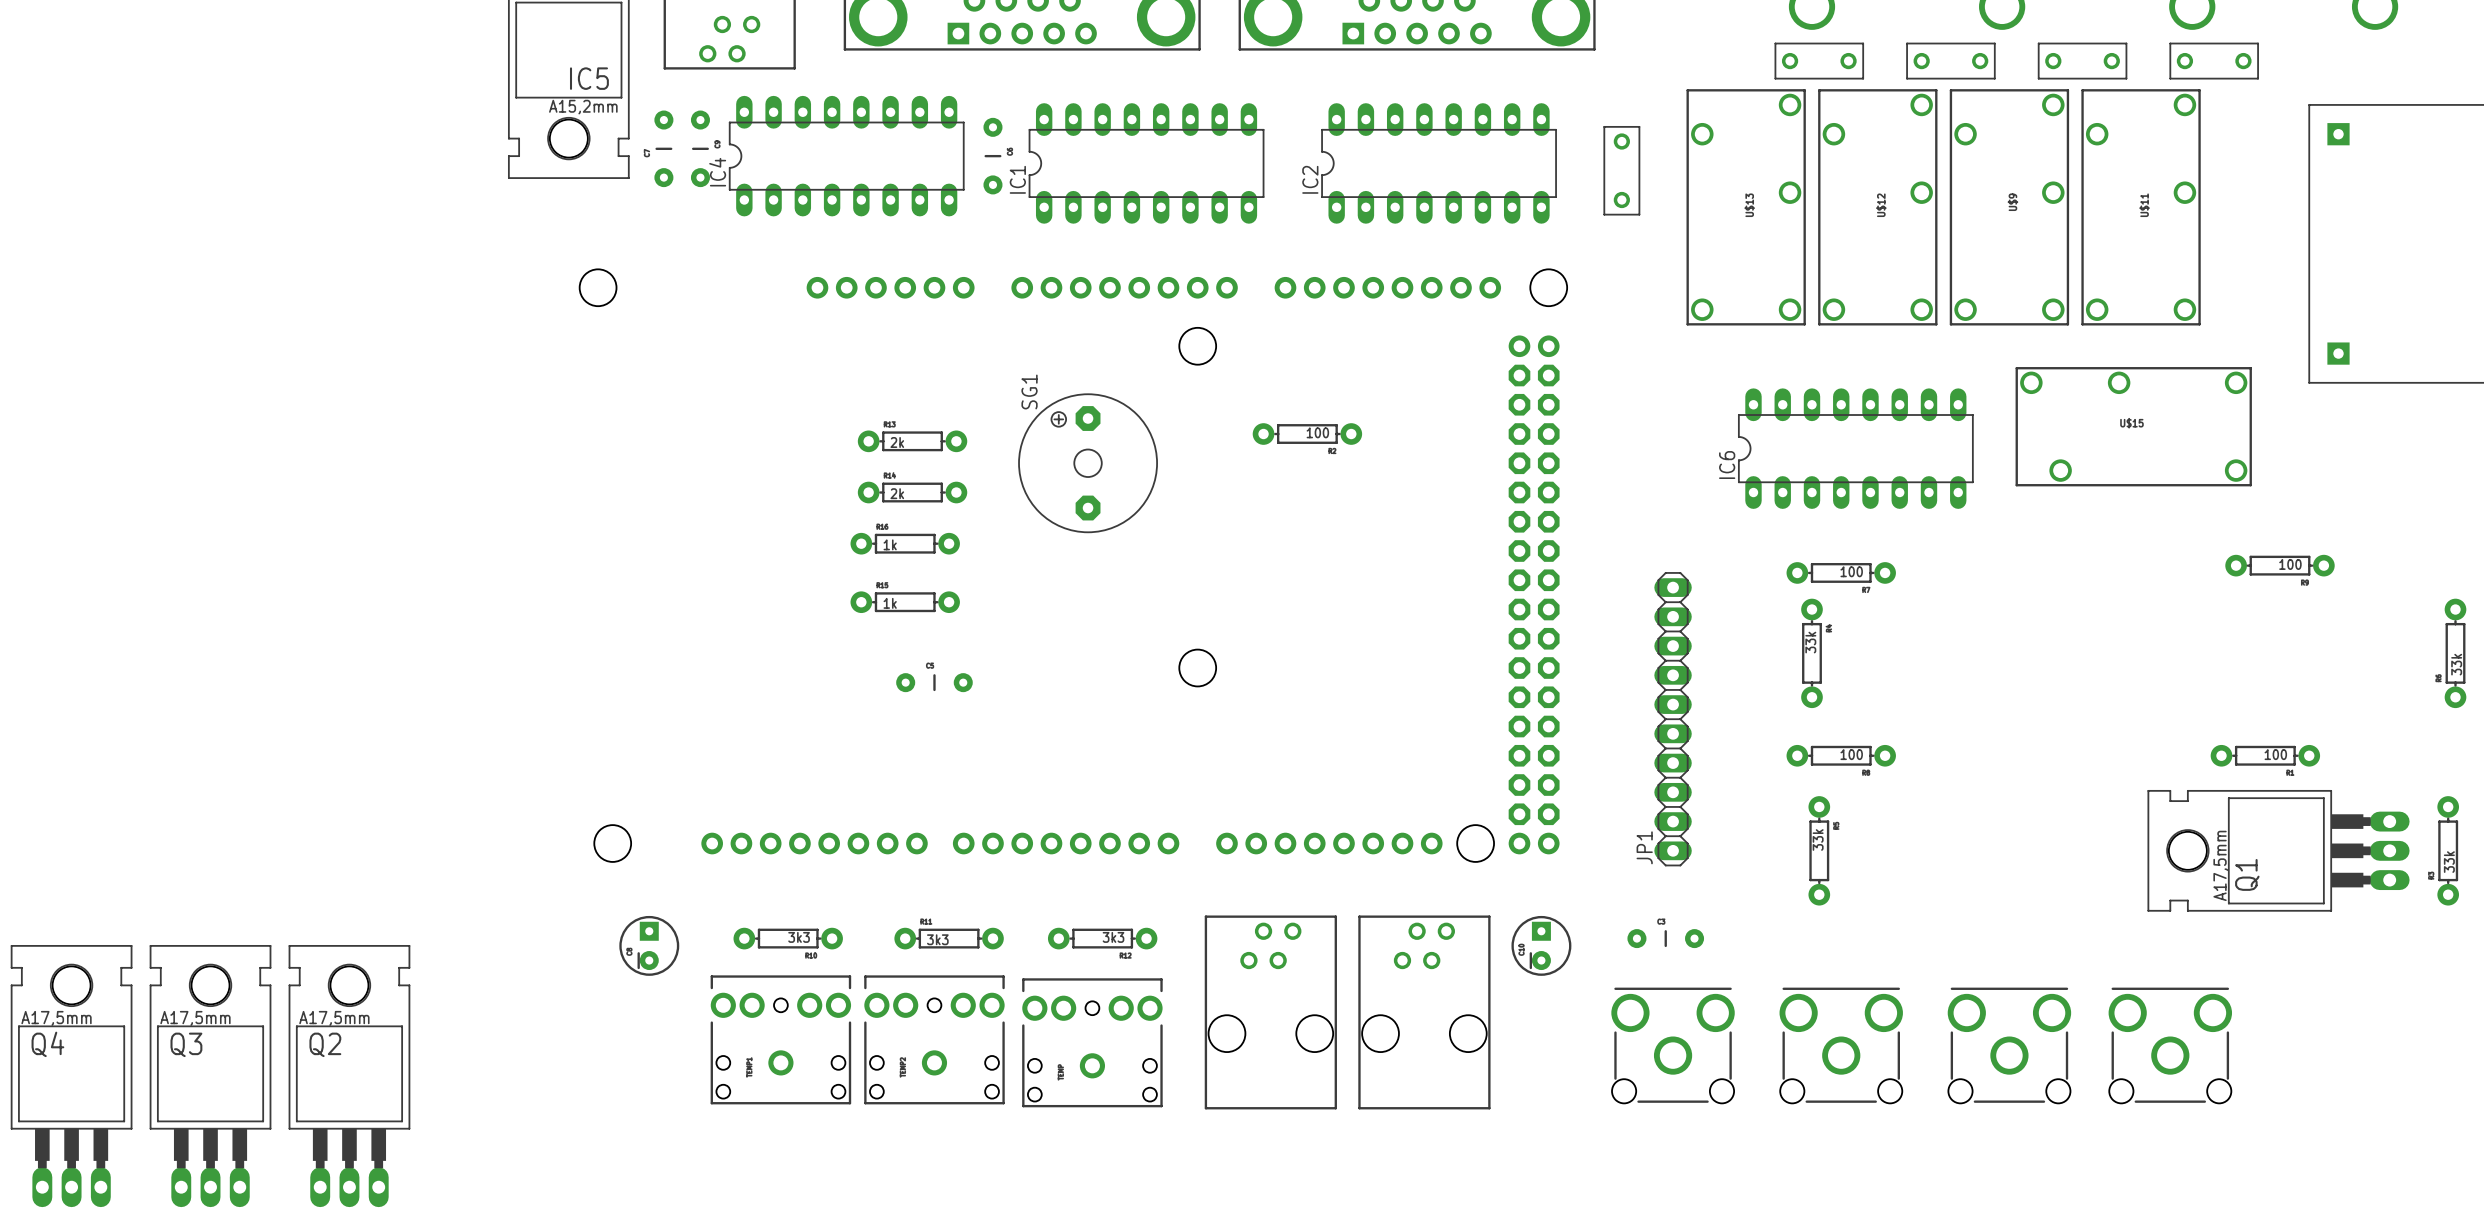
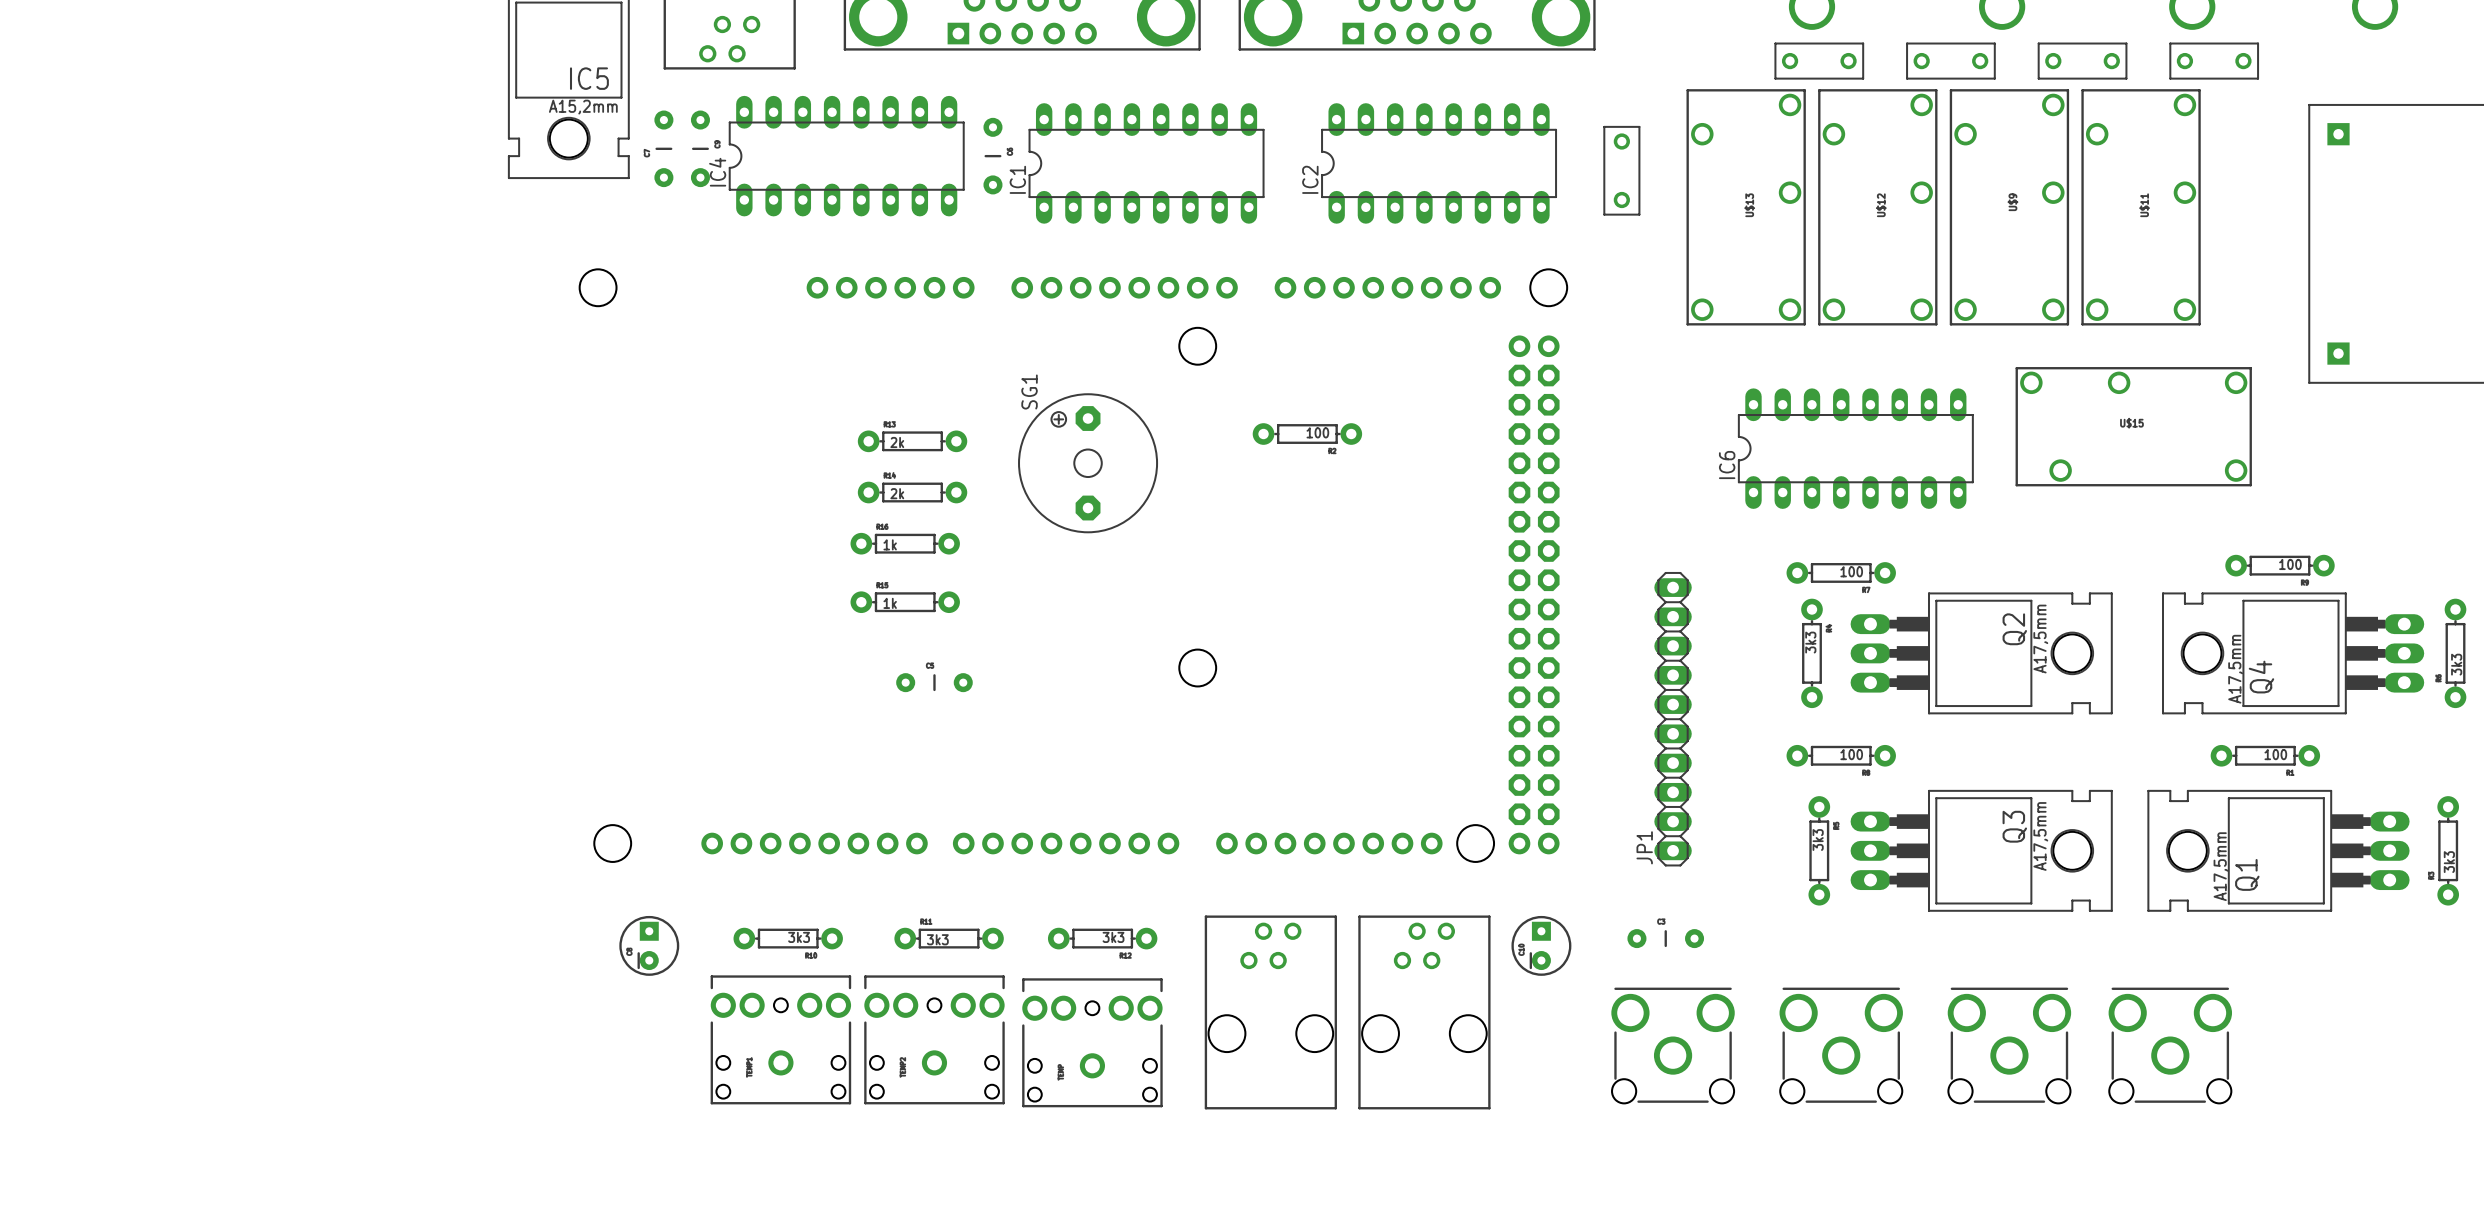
part value: 33k (1810, 642) -> 3k3 (1810, 642)
part value: 33k (2456, 664) -> 3k3 (2456, 664)
Q1 footprint: [2147, 789, 2410, 912] -> [2147, 790, 2410, 912]
part value: 33k (1818, 839) -> 3k3 (1818, 839)
part value: 33k (2449, 862) -> 3k3 (2449, 862)
Q4 footprint: [10, 945, 133, 1208] -> [2162, 592, 2425, 715]
Q3 footprint: [149, 945, 272, 1208] -> [1850, 790, 2113, 912]
Q2 footprint: [288, 945, 411, 1208] -> [1850, 592, 2113, 715]
Q4 name position: Q4 (47, 1044) -> Q4 (2261, 677)
Q3 name position: Q3 (186, 1044) -> Q3 (2014, 826)
Q2 name position: Q2 (325, 1044) -> Q2 (2014, 629)

